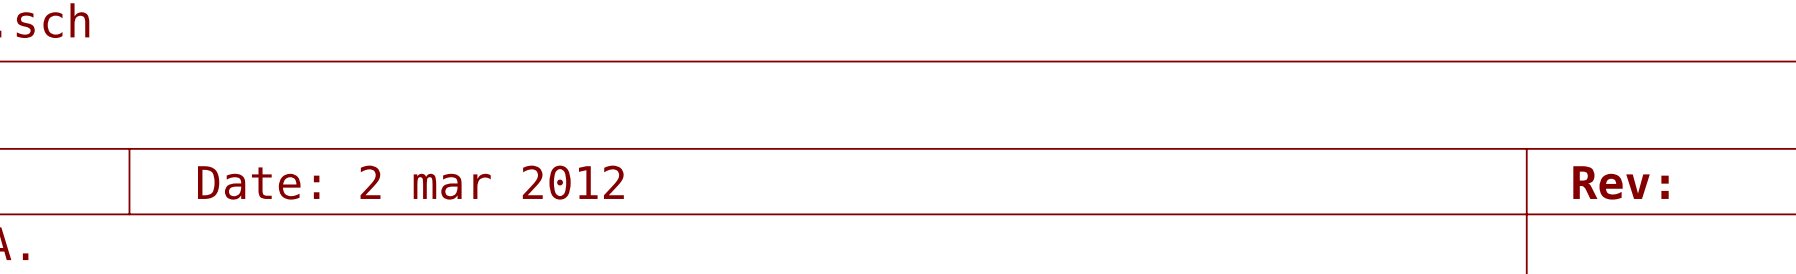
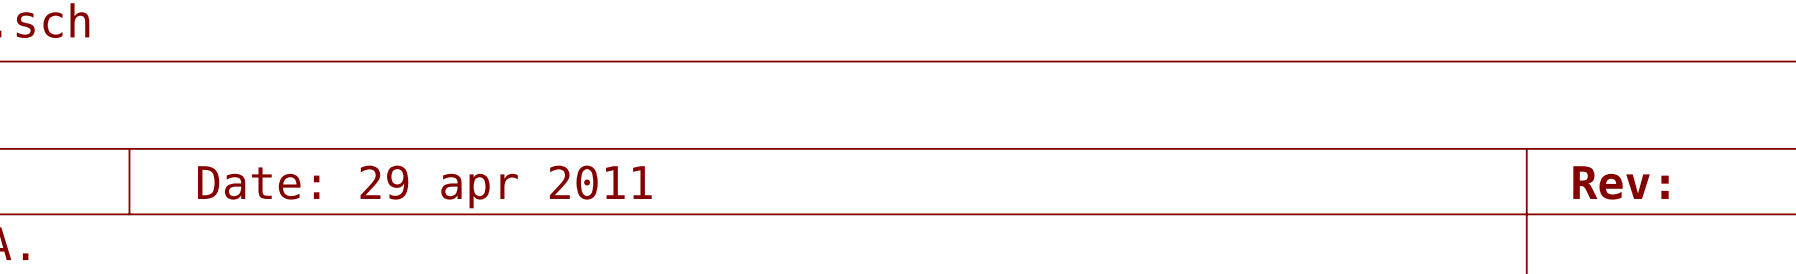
title block: Date: 2 mar 2012 (410, 182) -> Date: 29 apr 2011 (424, 186)

